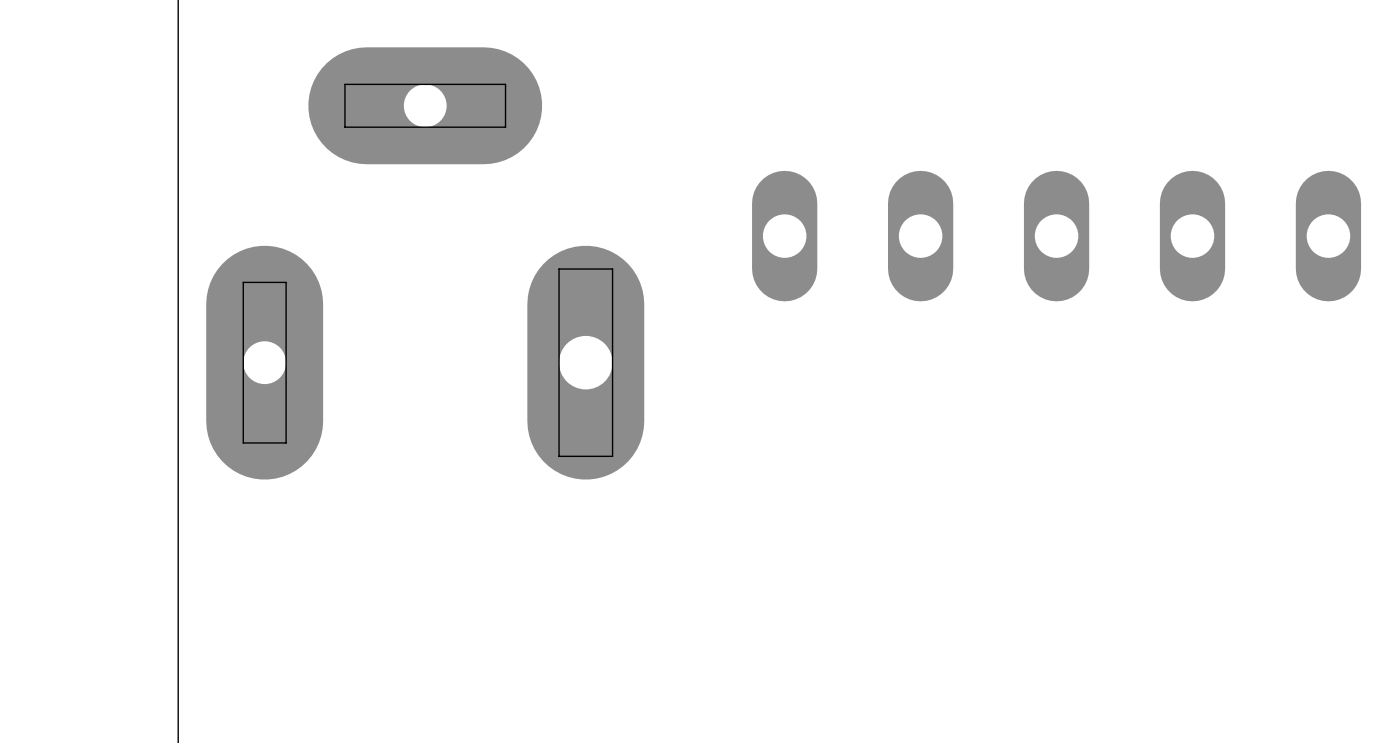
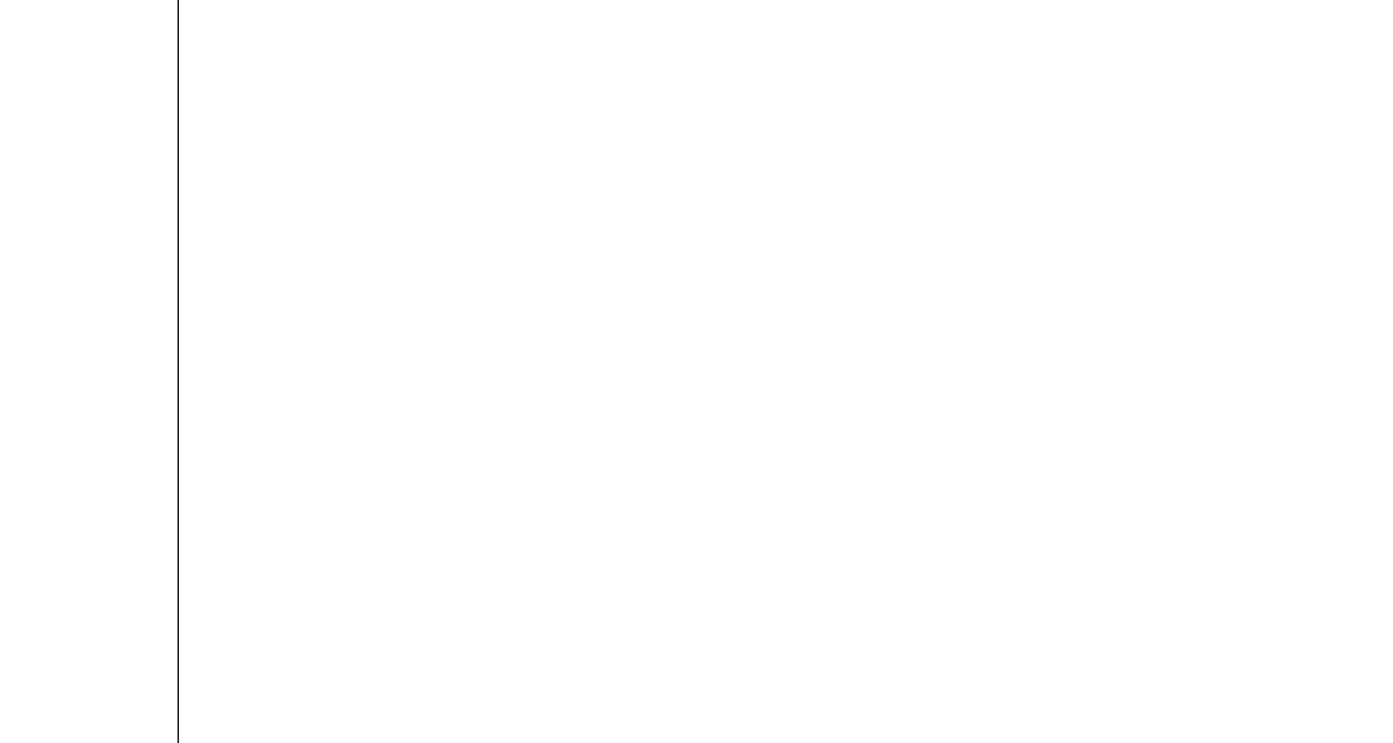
part: (1056, 236) -> none
part: (425, 263) -> none

